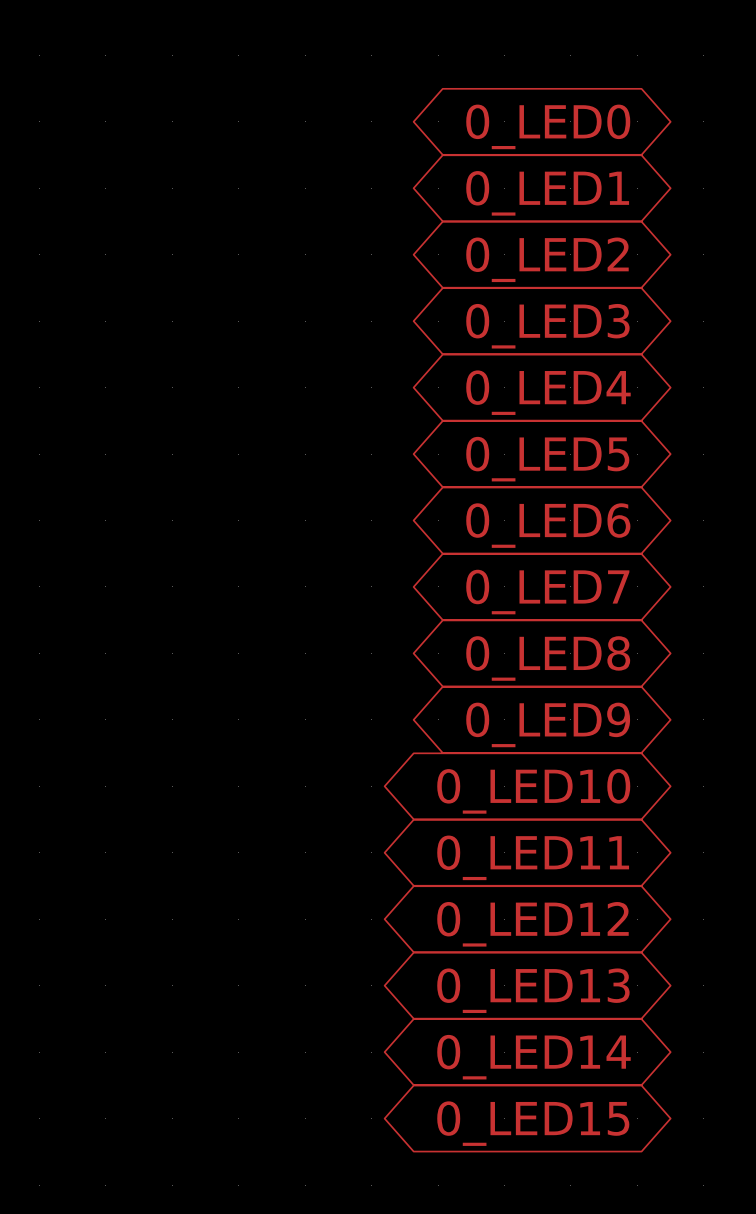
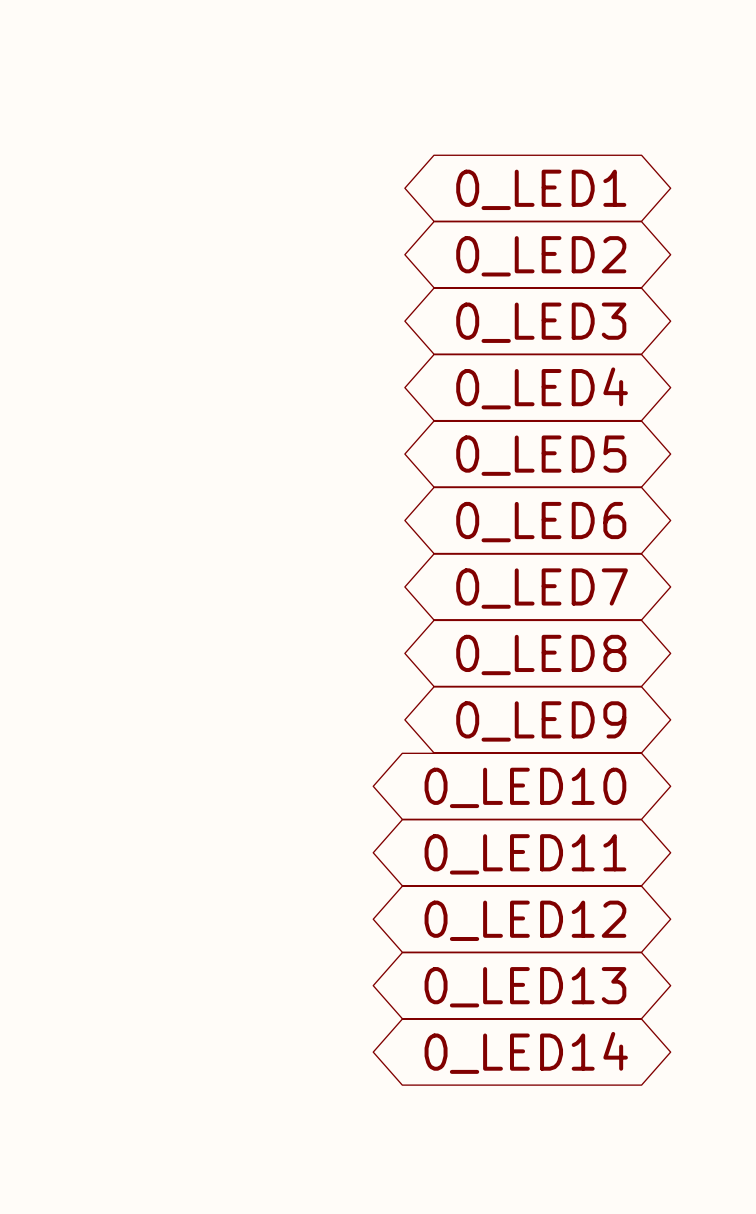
global label: 0_LED0 (548, 126) -> none
global label: 0_LED15 (533, 1123) -> none

